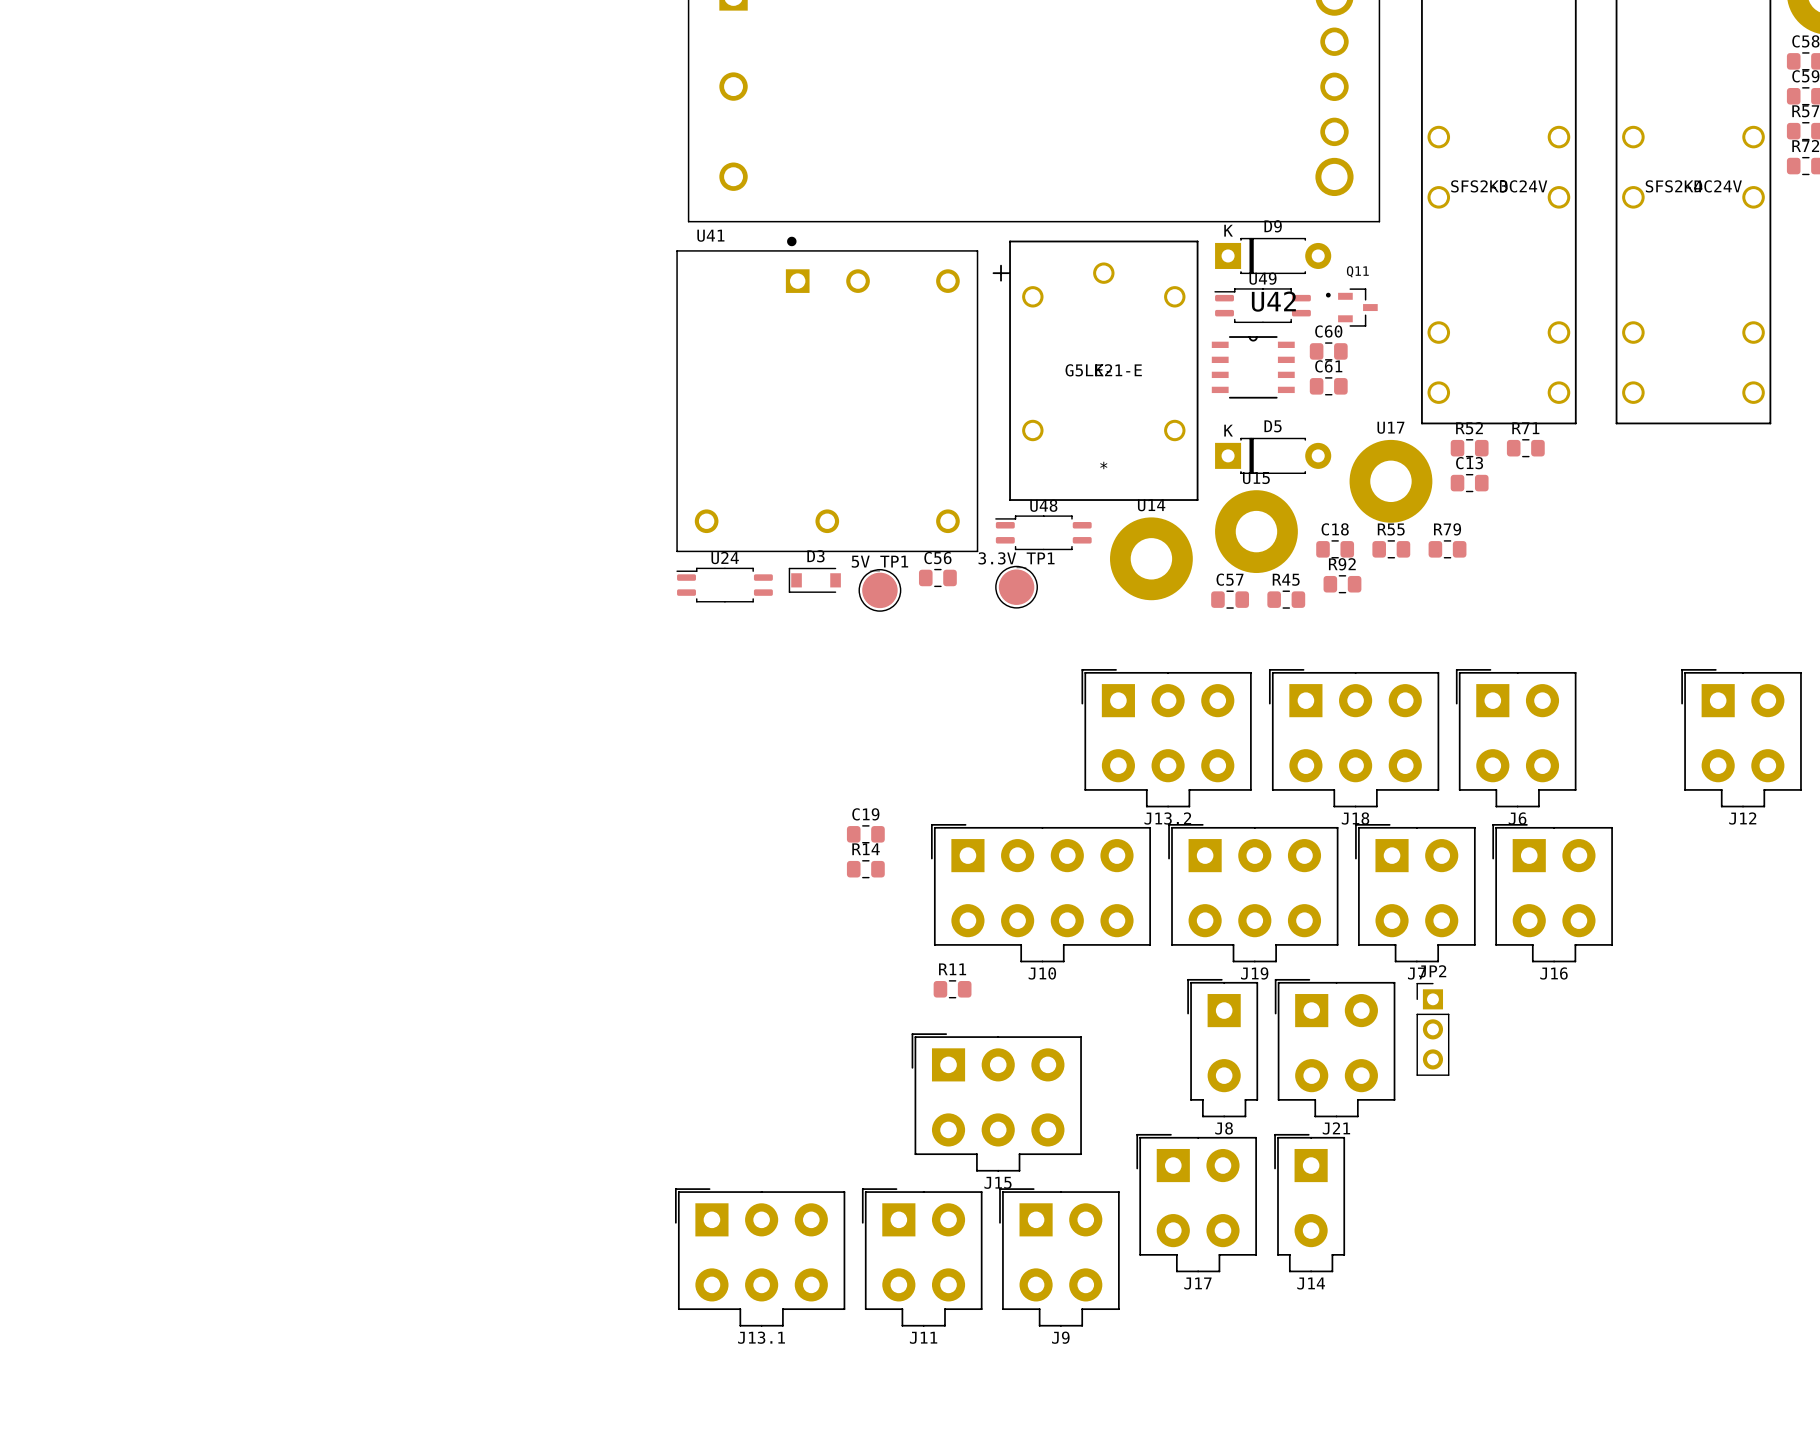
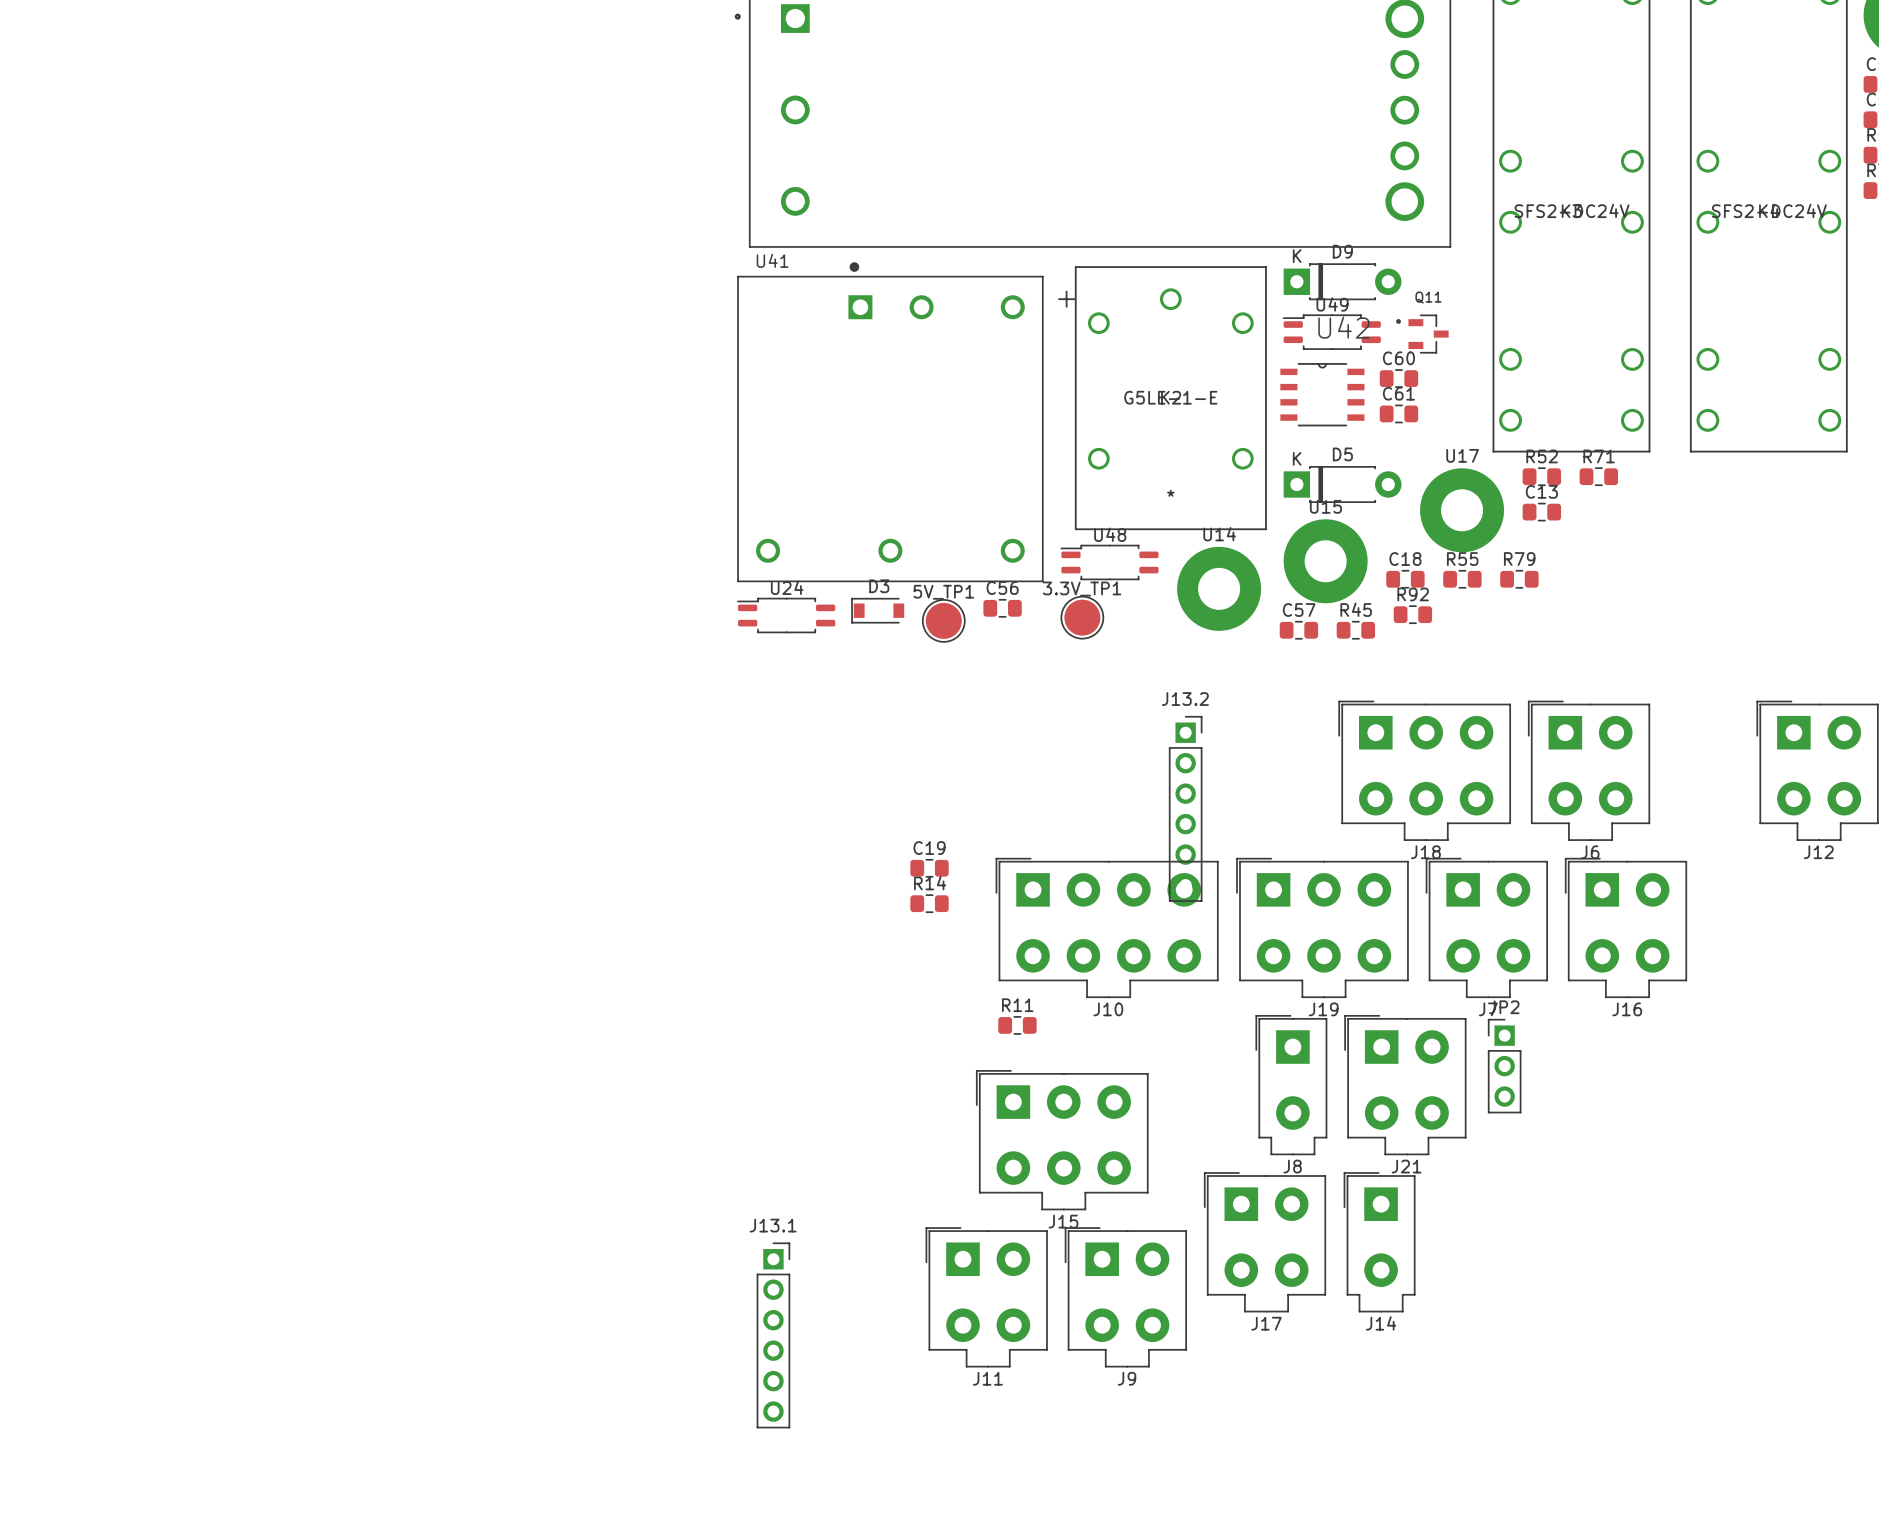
J13.2 footprint: [1081, 669, 1252, 808] -> [1168, 716, 1203, 902]
J13.2 name position: J13.2 (1167, 818) -> J13.2 (1185, 699)
J13.1 footprint: [675, 1188, 846, 1327] -> [756, 1242, 791, 1429]
J13.1 name position: J13.1 (761, 1337) -> J13.1 (773, 1225)

